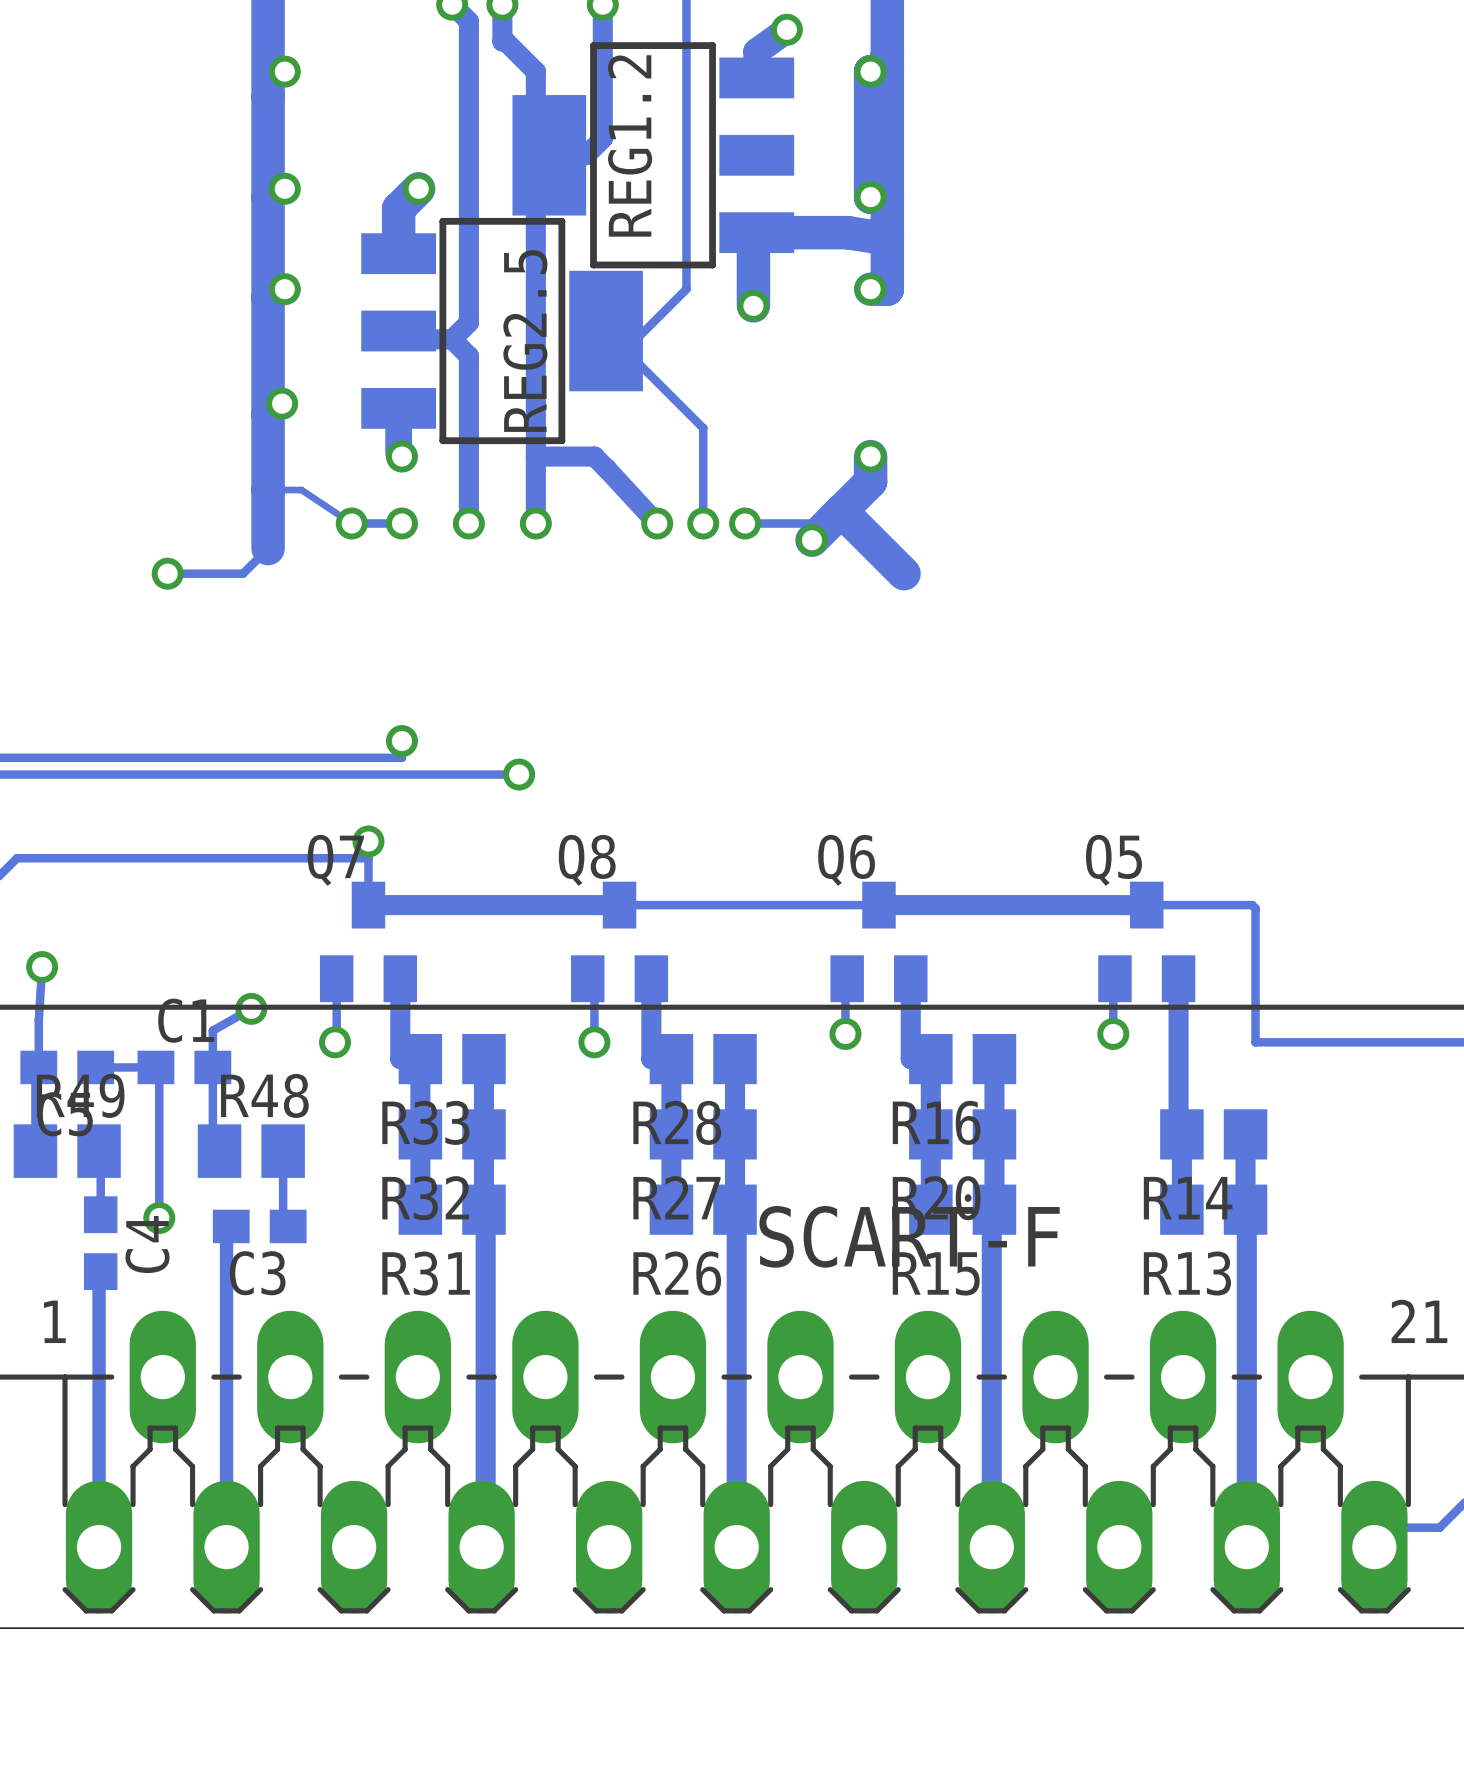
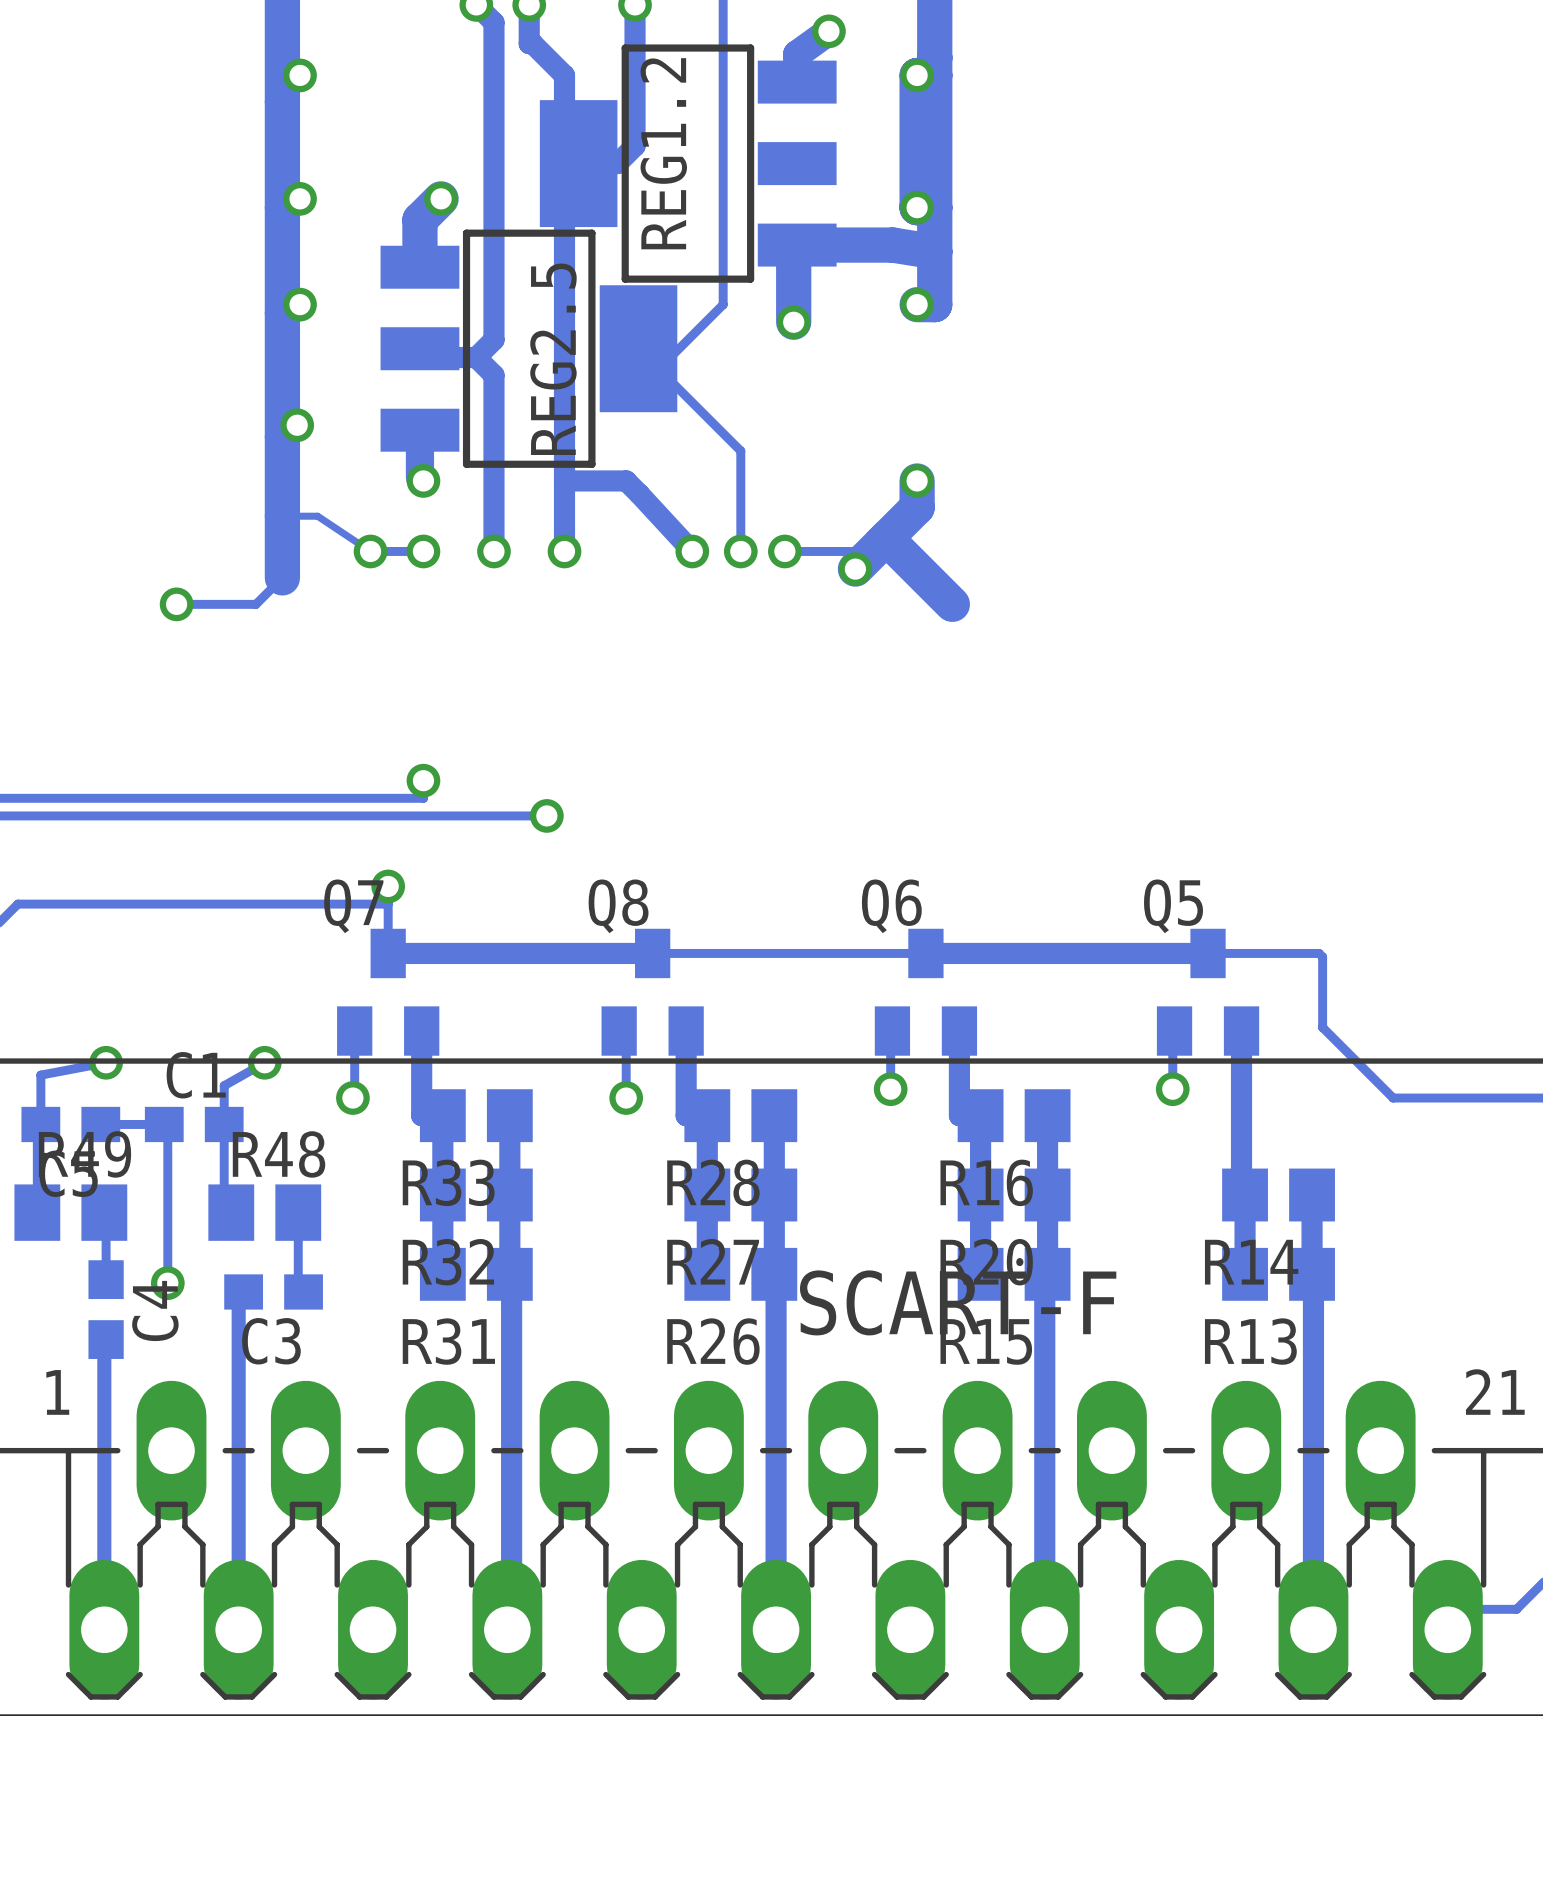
track: (42, 967) (38, 1020) -> (106, 1062) (40, 1075)
via position: (42, 967) -> (106, 1062)
track: (1255, 975) (1255, 1042) (1322, 1042) -> (1322, 1027) (1393, 1098)

